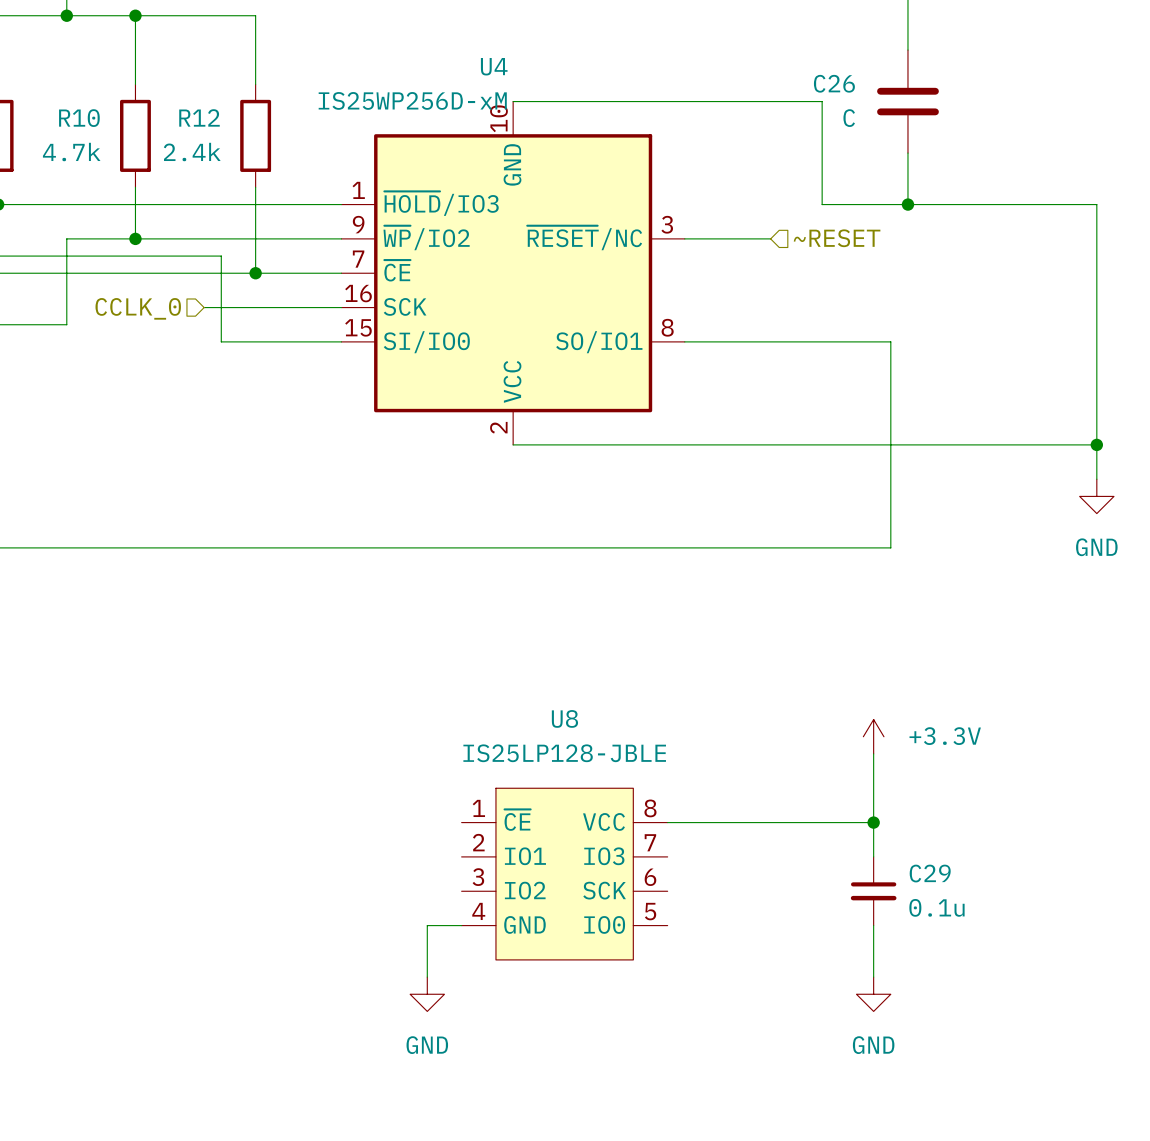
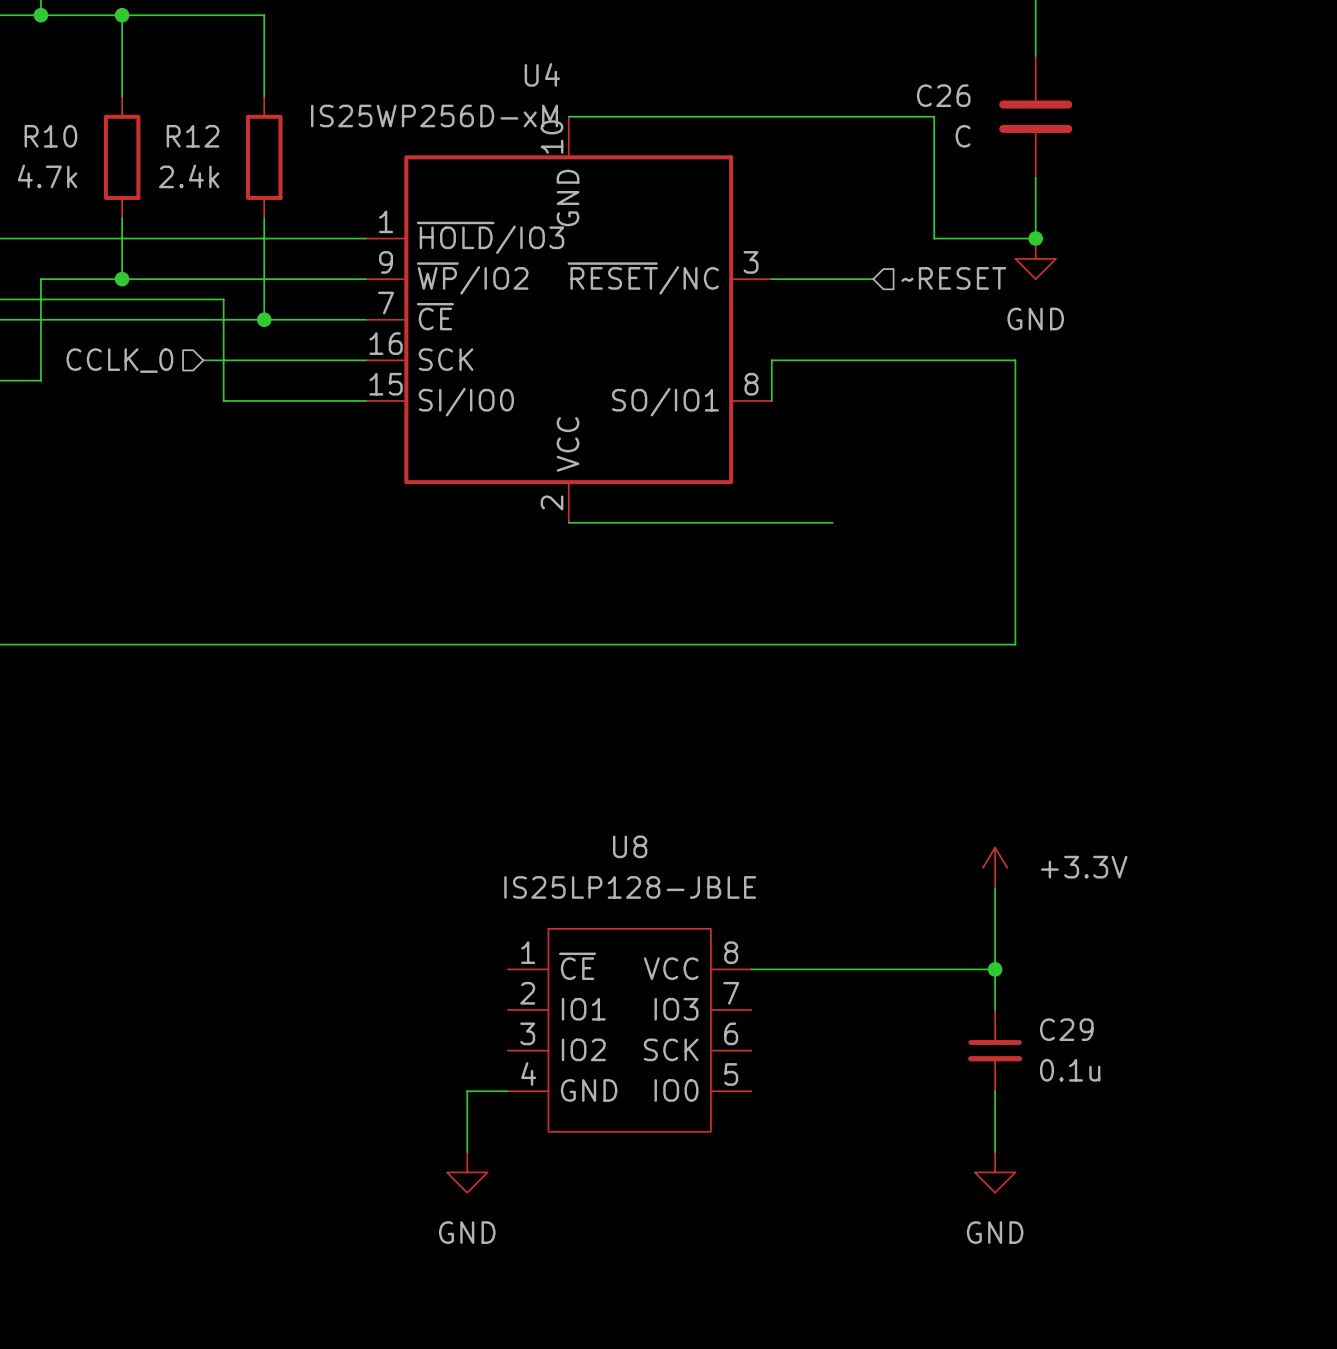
wire: (907, 204) (1096, 204) (1096, 479) -> none
wire: (684, 341) (890, 341) -> (771, 400) (771, 360) (1015, 360) (1015, 400)
wire: (736, 444) (1096, 444) -> none
junction: (1096, 444) -> none
power symbol position: GND (1096, 496) -> GND (1035, 258)

